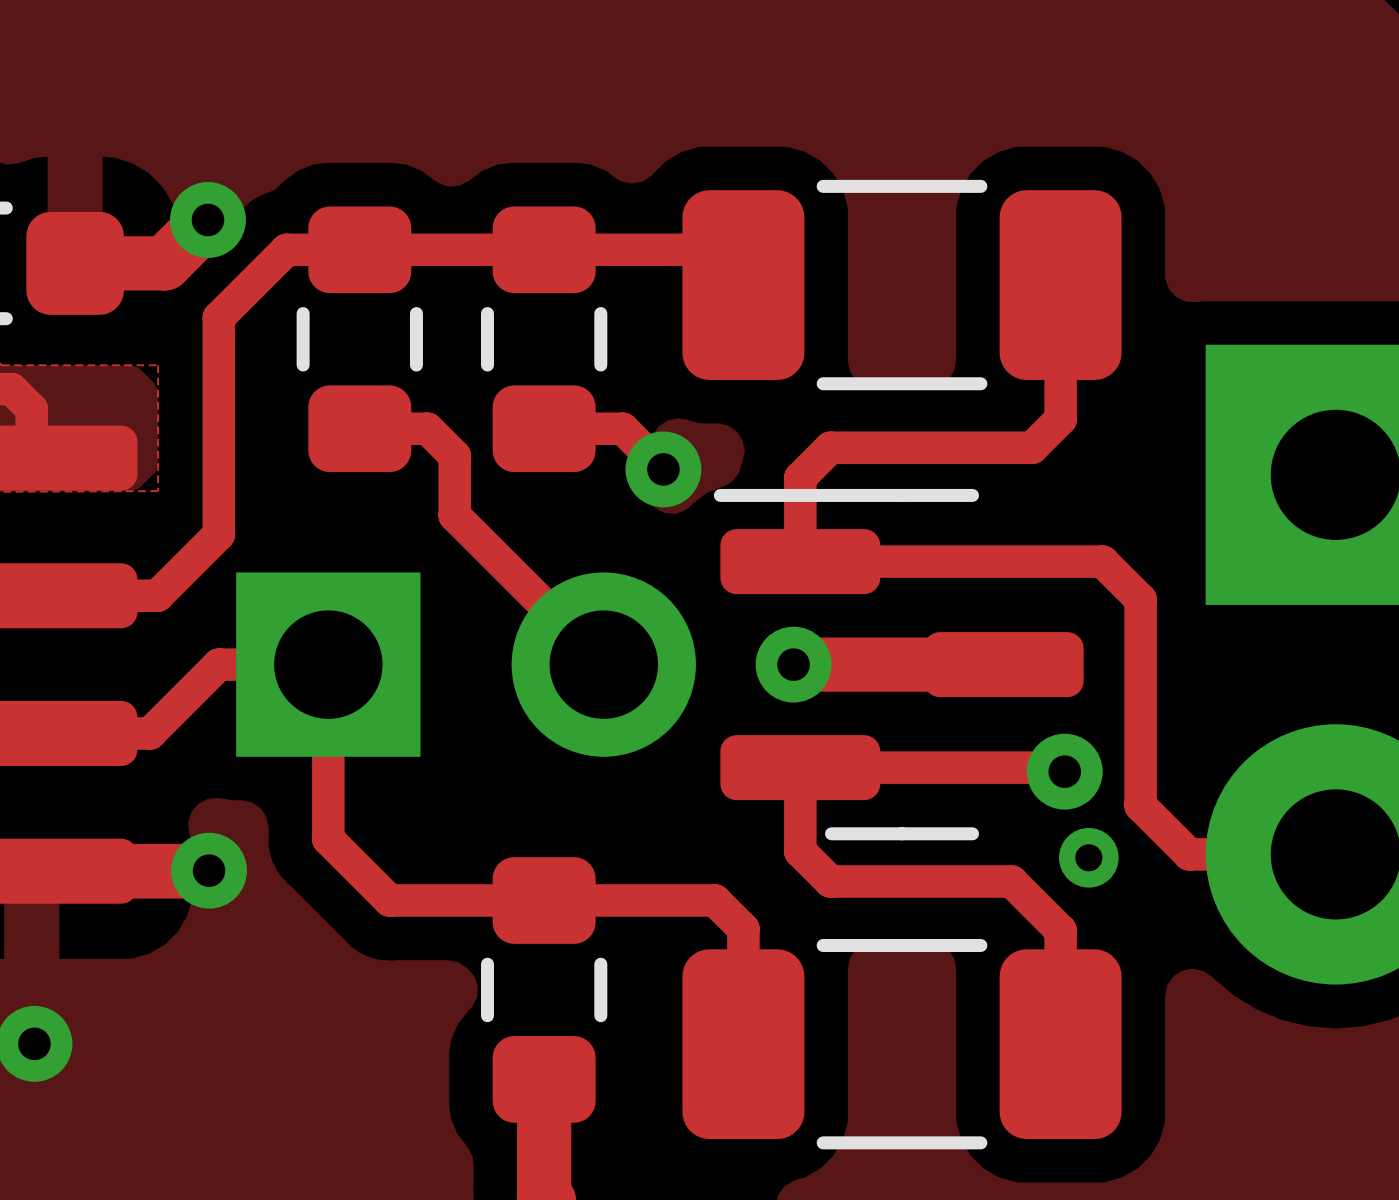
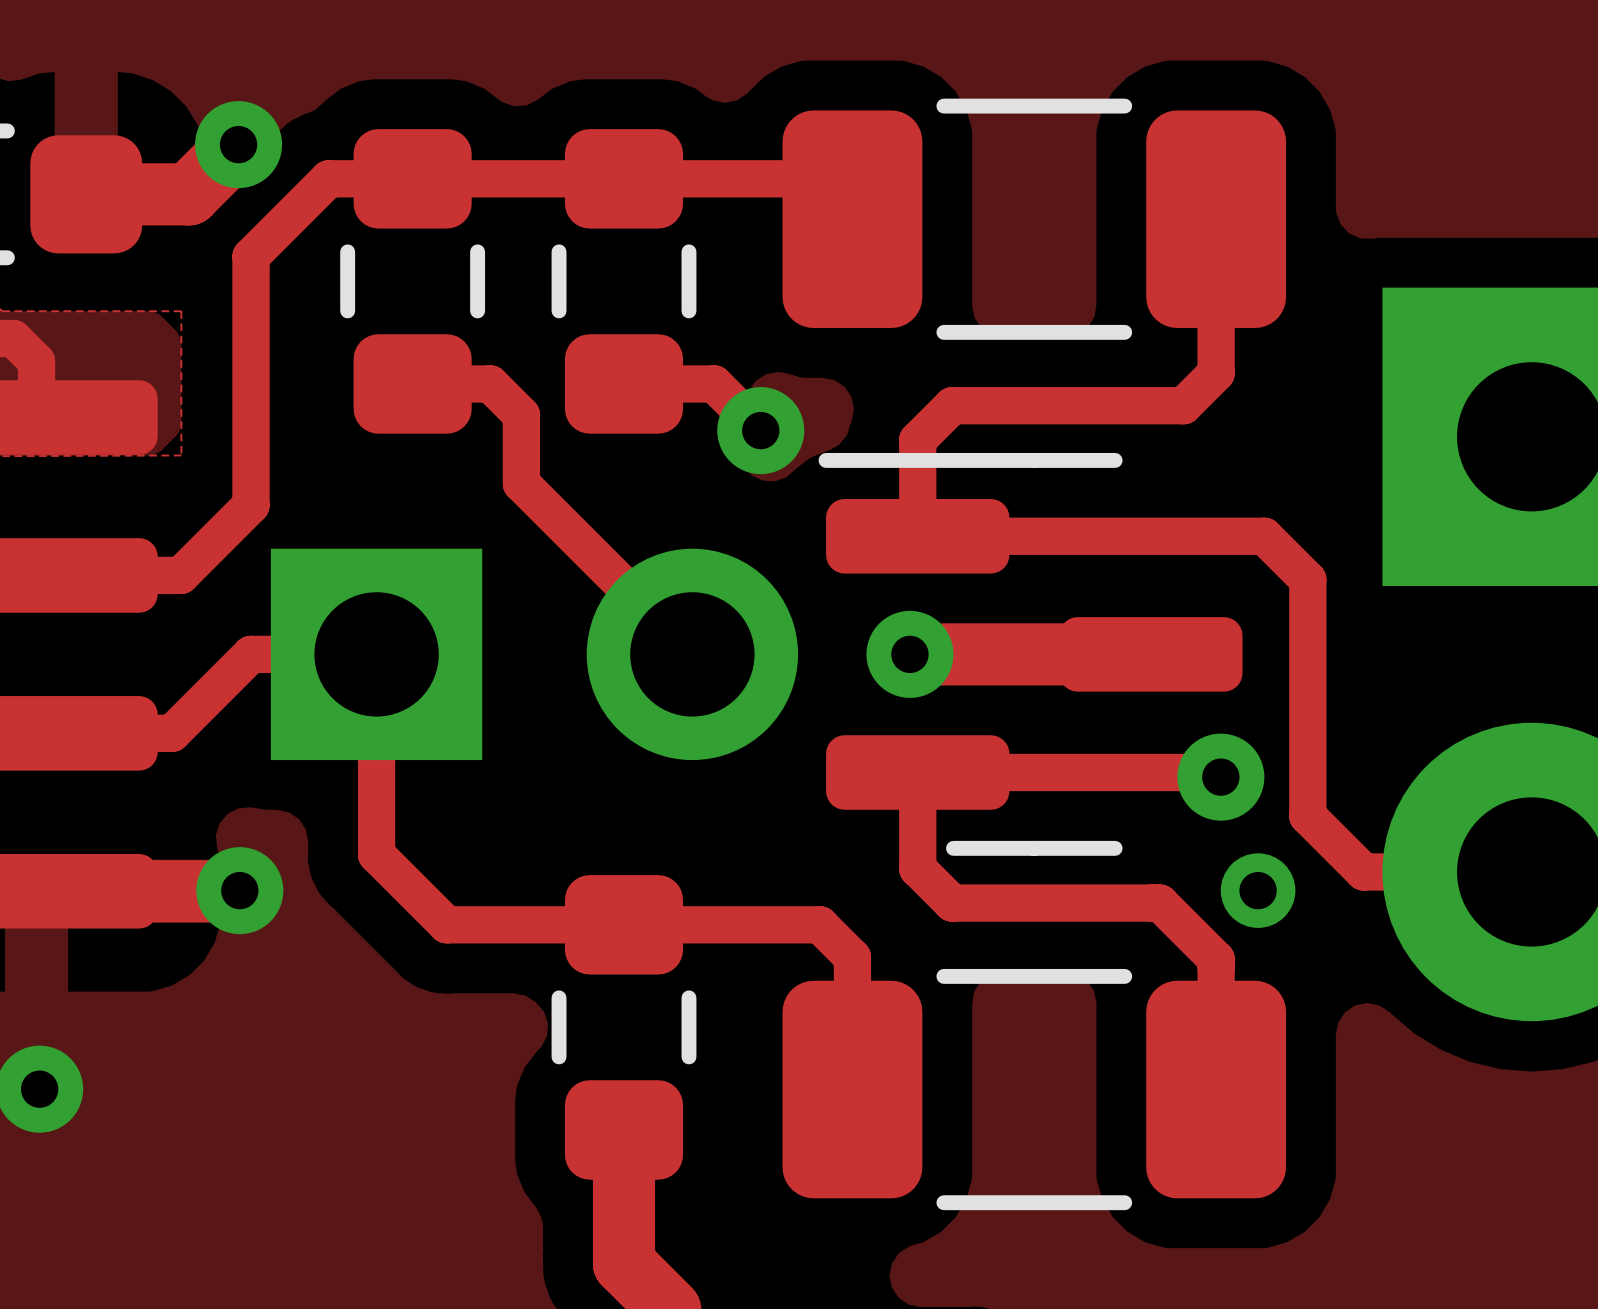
via position: (1088, 857) -> (1258, 890)

